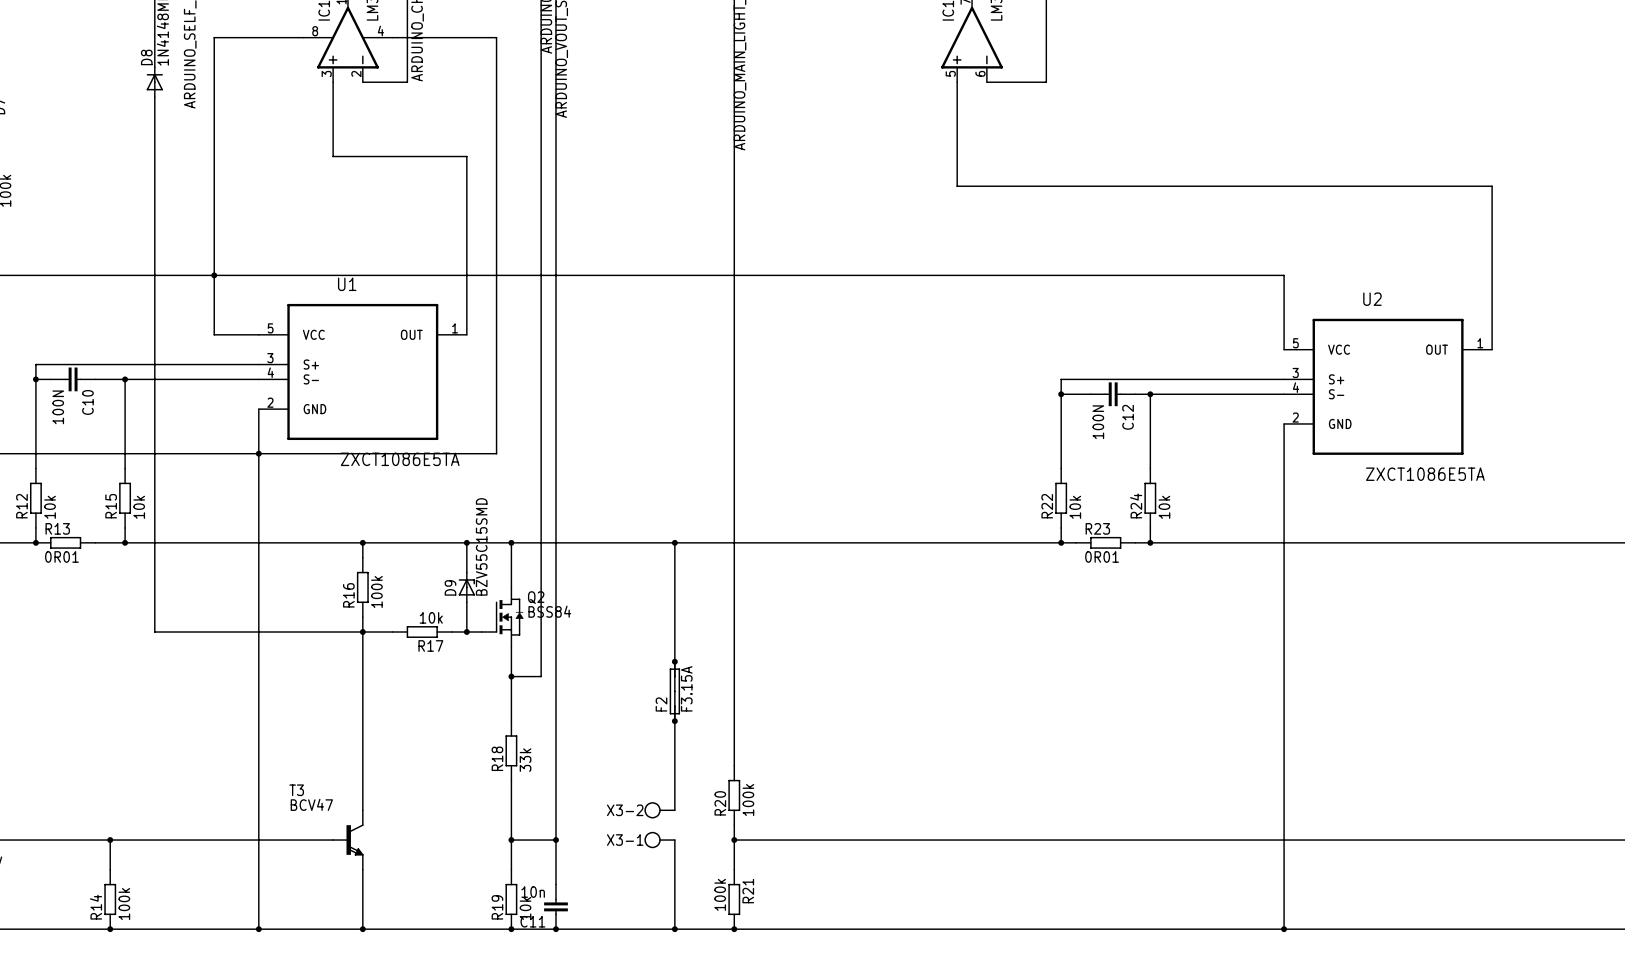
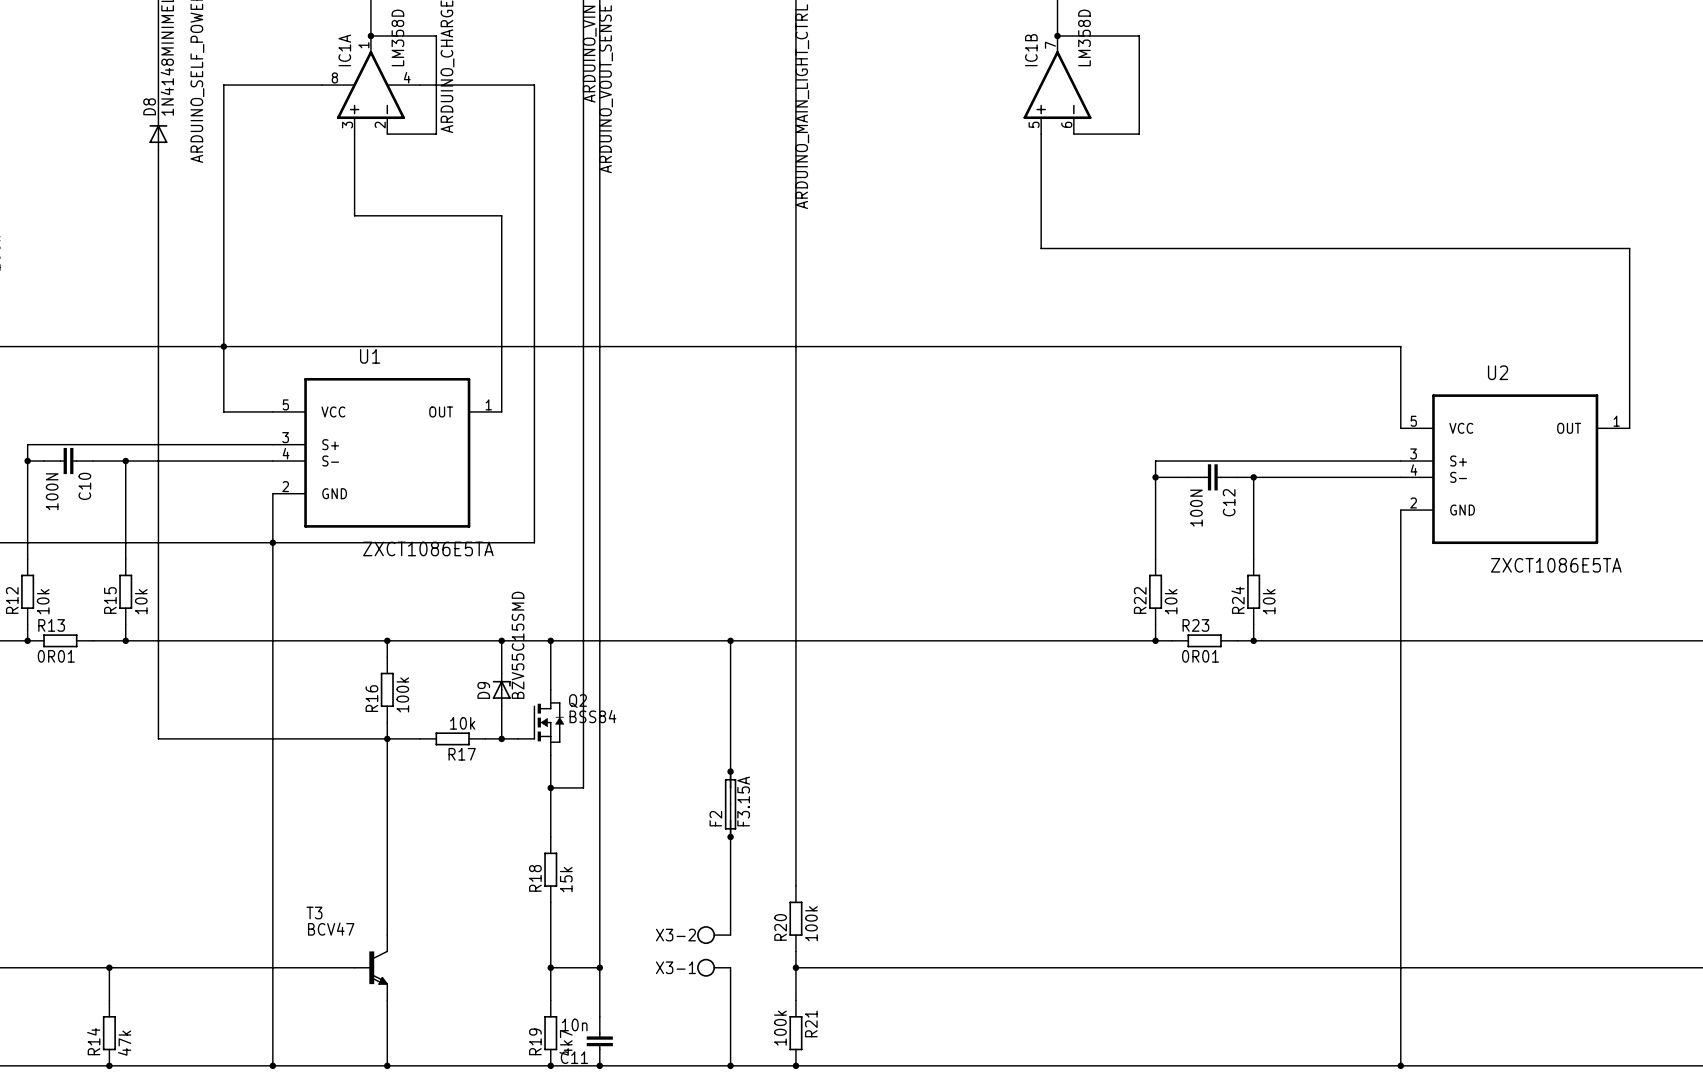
R18 value: 33k (525, 760) -> 15k (566, 879)
R14 value: 100k (124, 904) -> 47k (124, 1043)
R19 value: 10k (525, 908) -> 4k7 (566, 1042)

